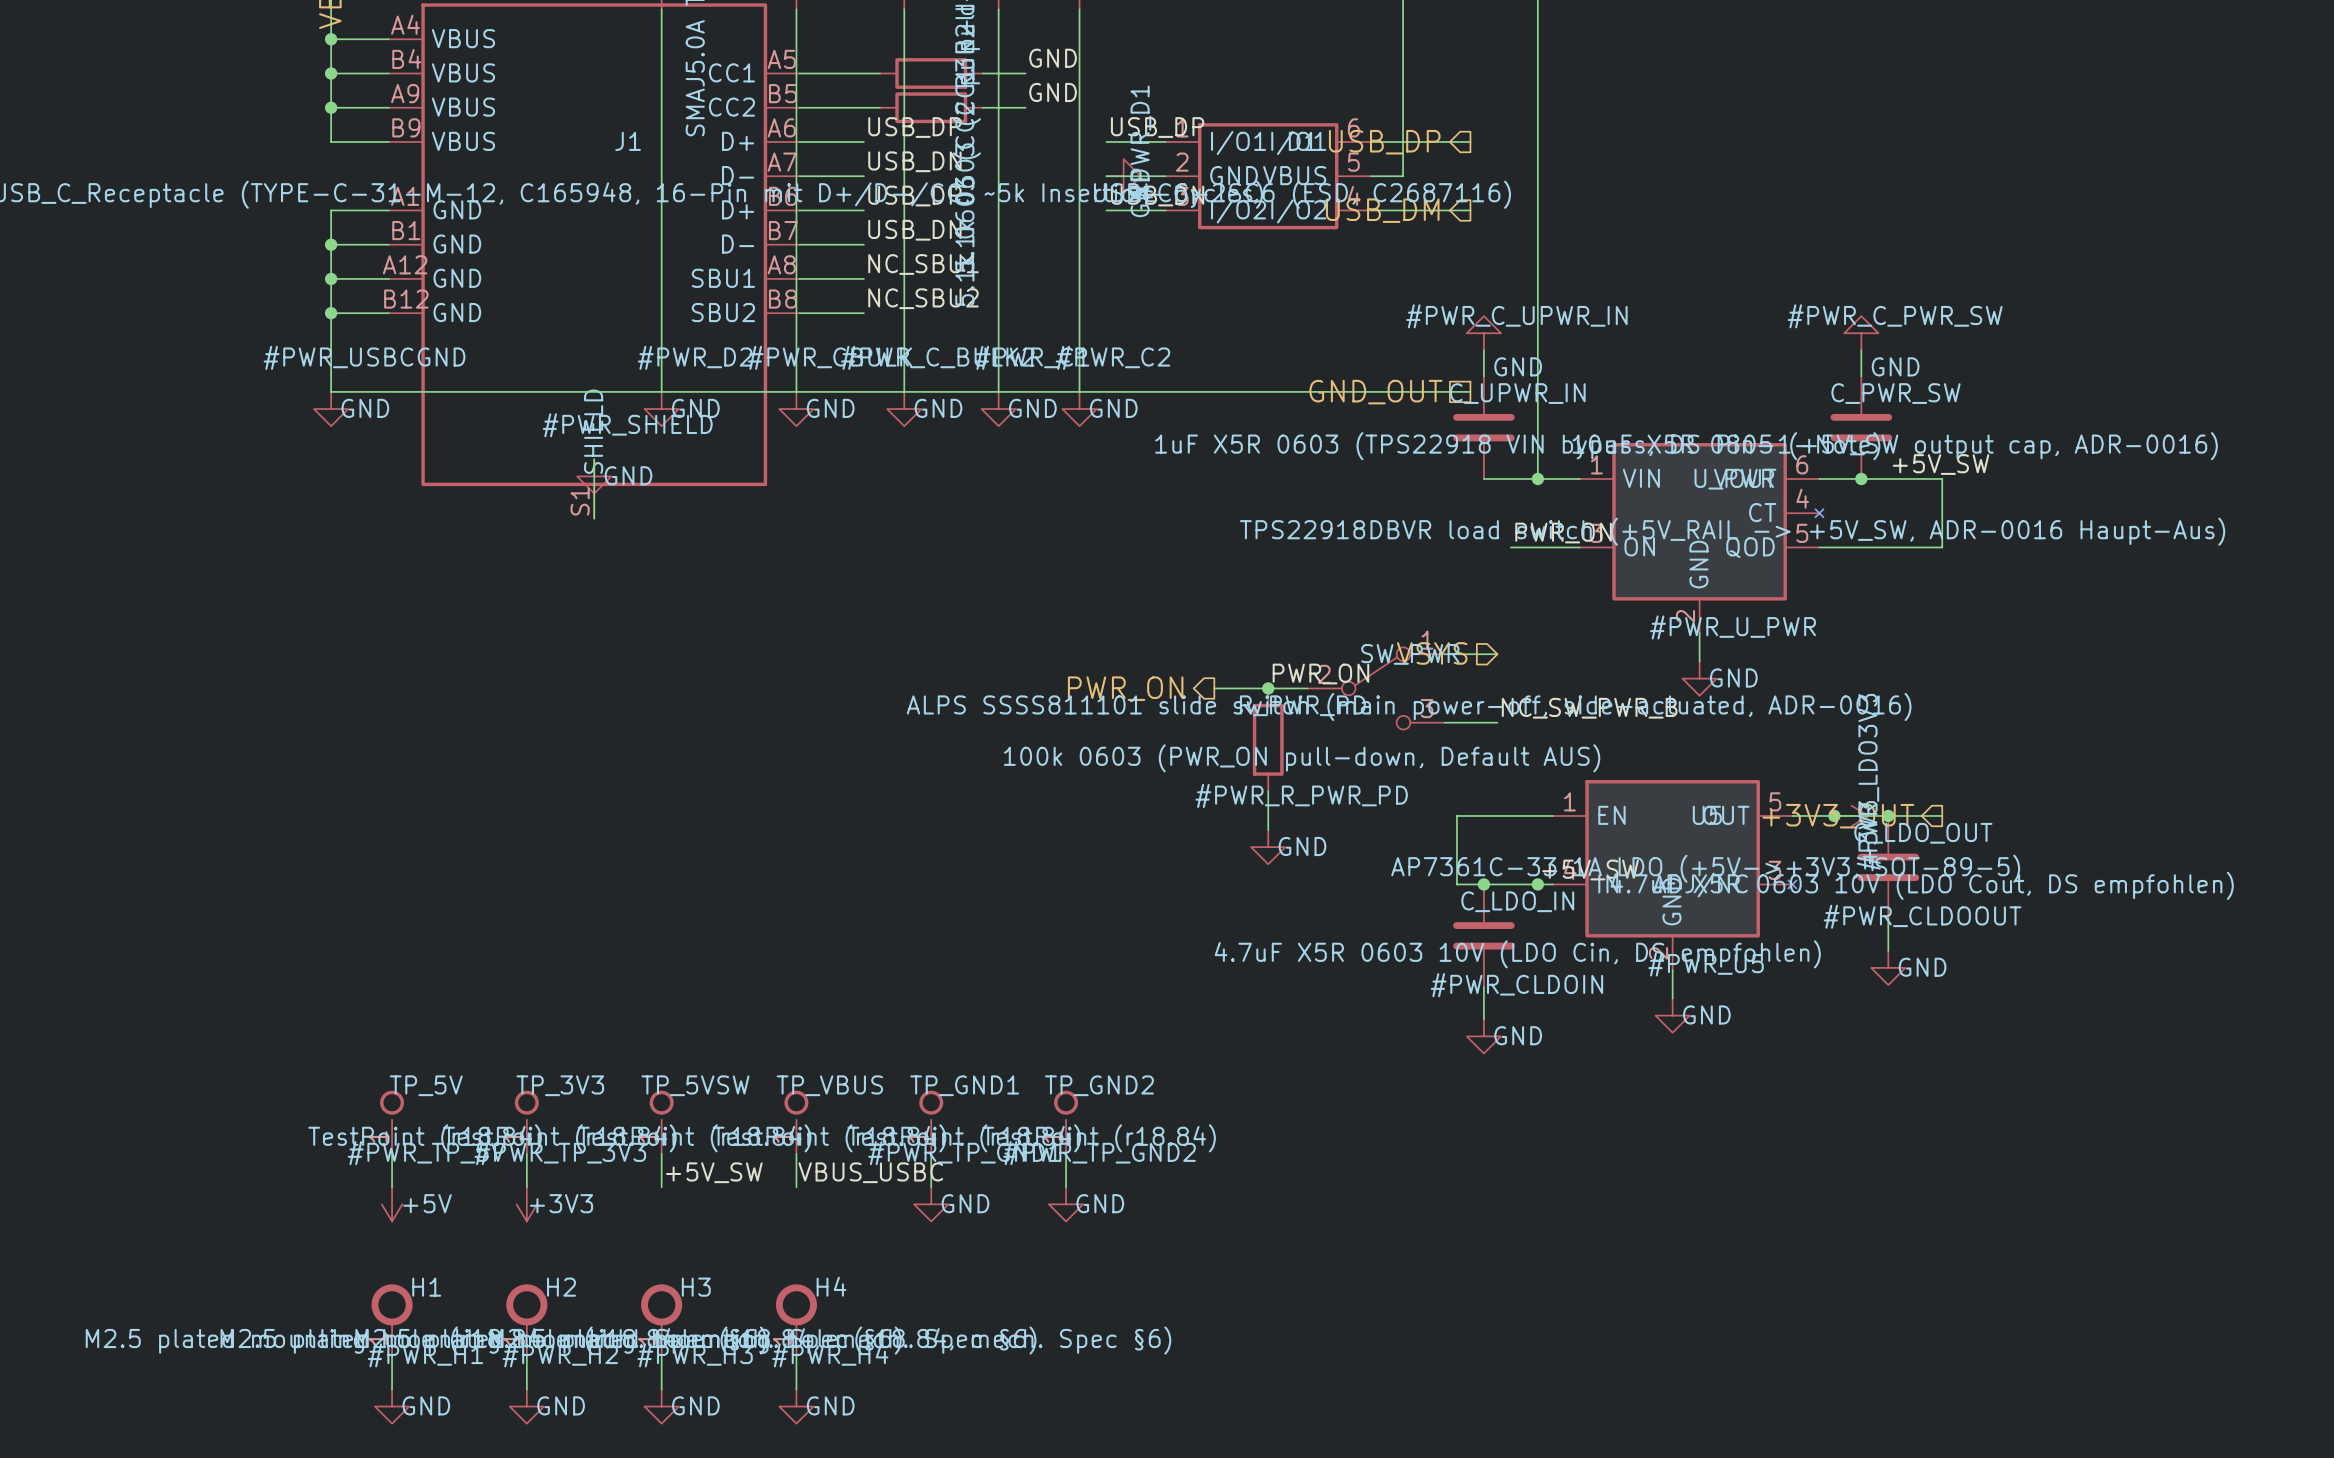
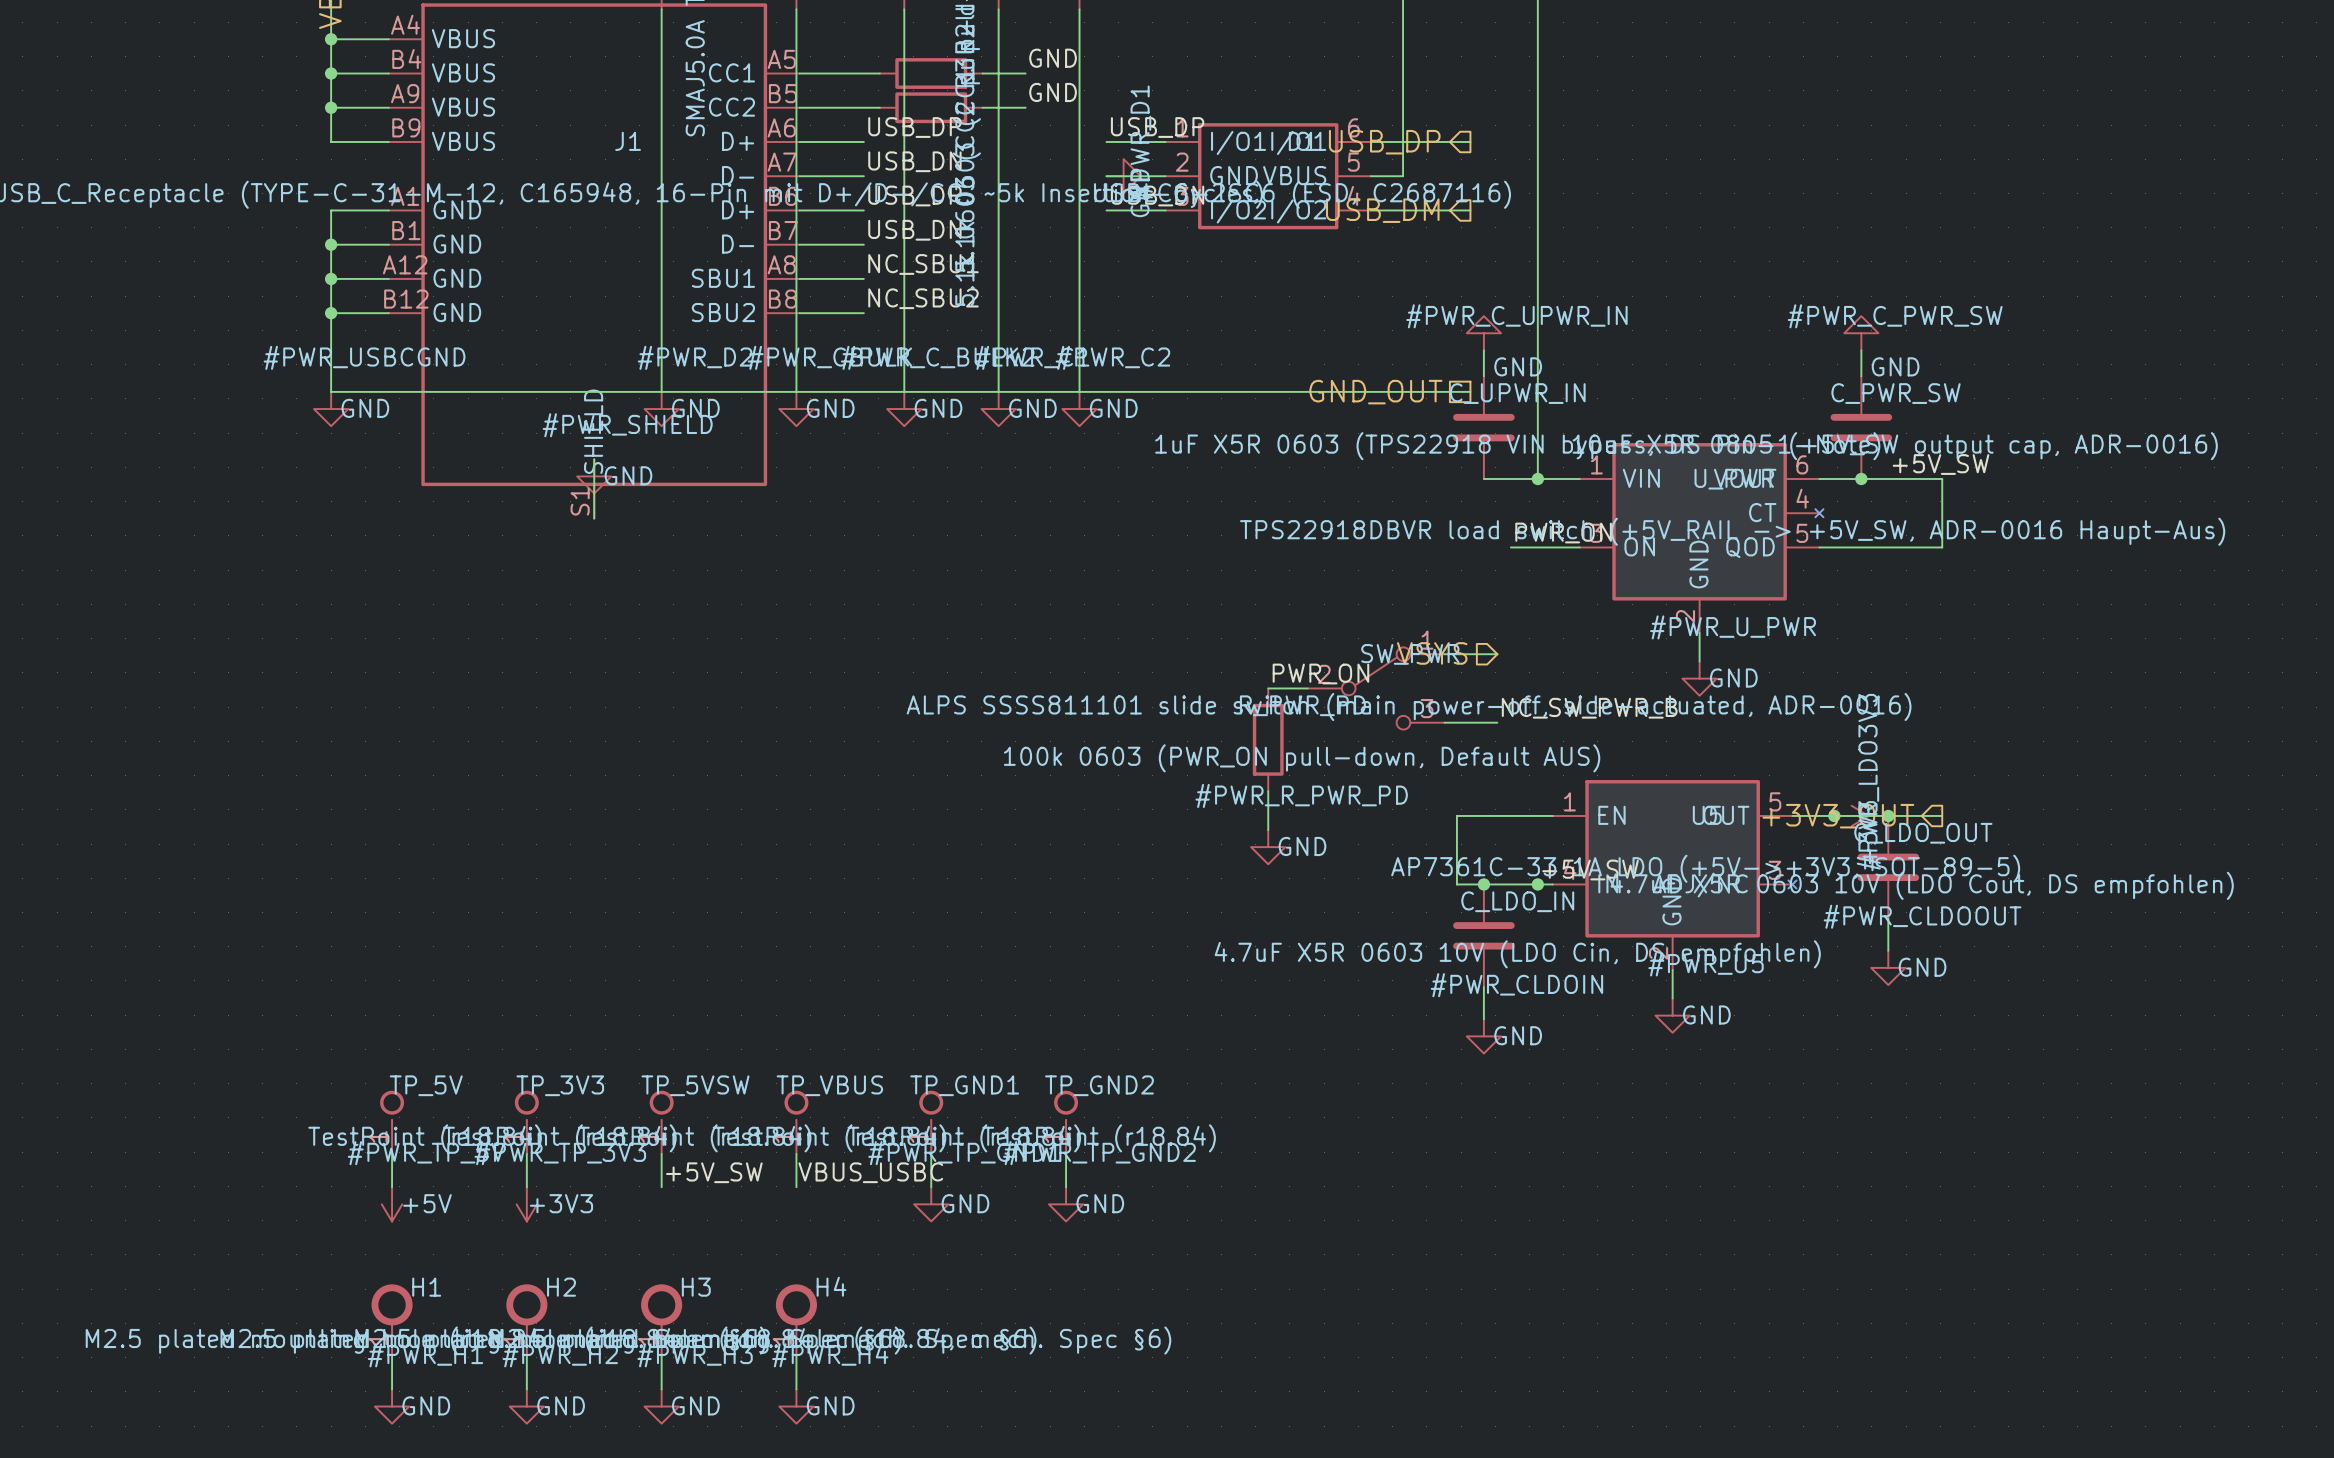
hierarchical label: PWR_ON (1125, 688) -> none
wire: (1214, 688) (1268, 688) -> none
junction: (1268, 688) -> none

